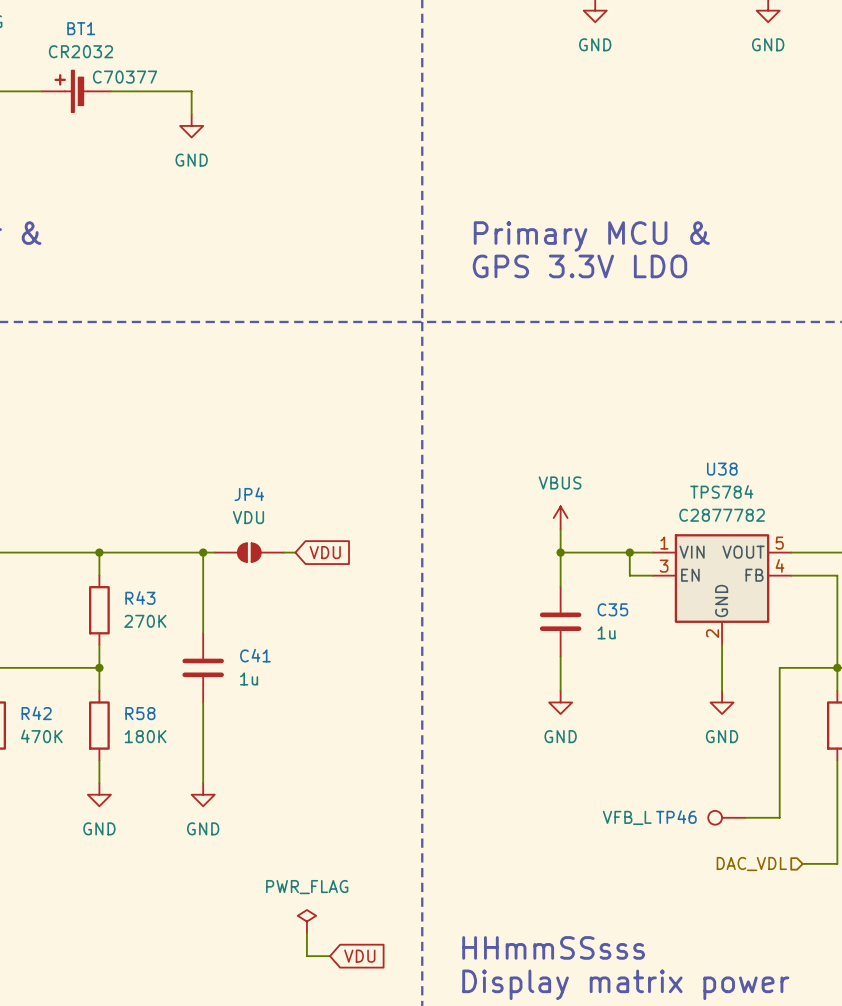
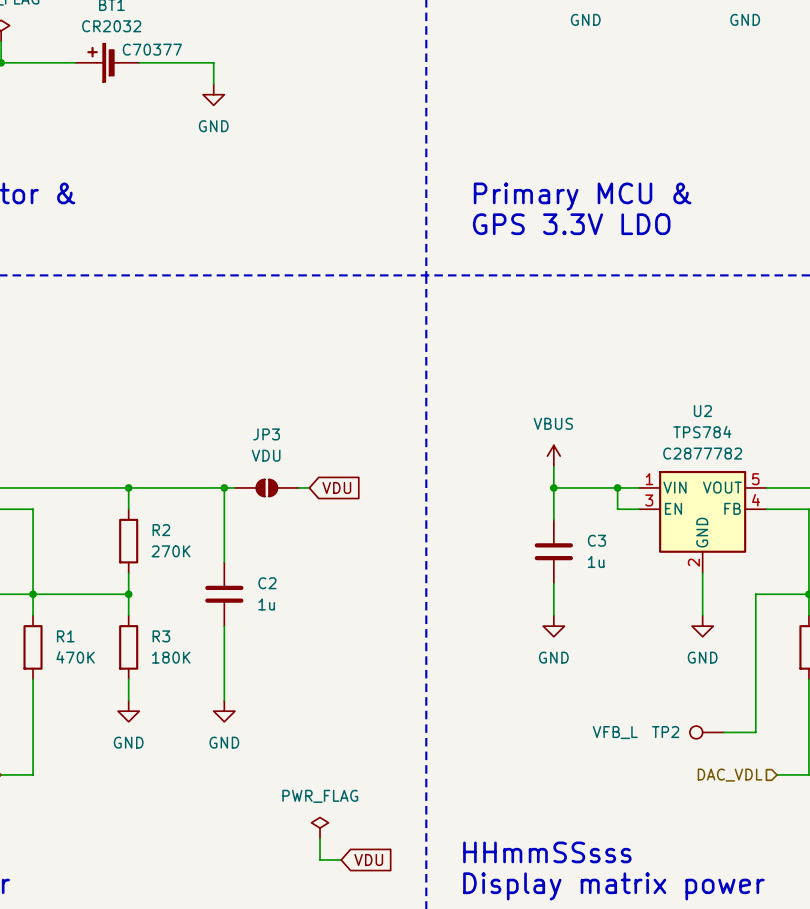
U38 name: U38 (722, 469) -> U2 (702, 411)
JP4 name: JP4 (249, 494) -> JP3 (266, 434)
R43 name: R43 (140, 598) -> R2 (161, 530)
C35 name: C35 (612, 609) -> C3 (596, 540)
C41 name: C41 (255, 655) -> C2 (267, 583)
R42 name: R42 (36, 713) -> R1 (65, 636)
R58 name: R58 (140, 713) -> R3 (161, 636)
TP46 name: TP46 (676, 817) -> TP2 (665, 732)

